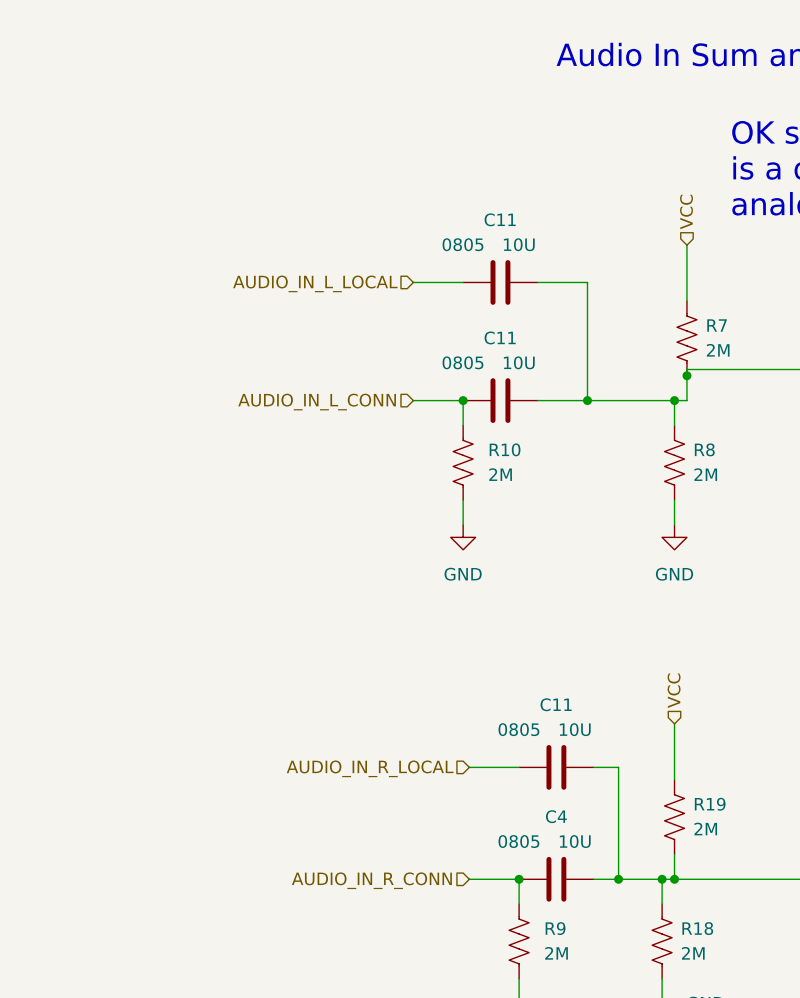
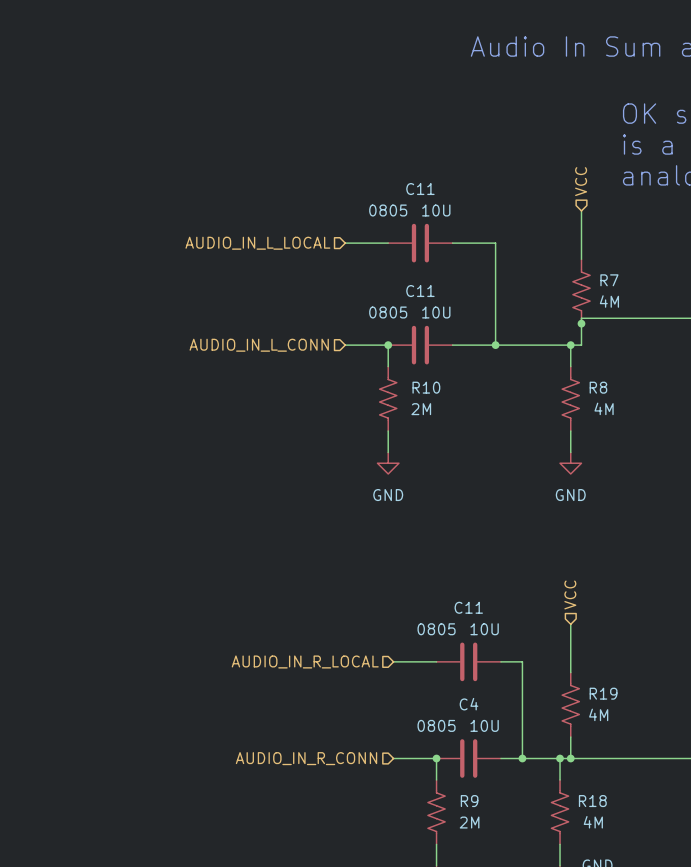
R7 value: 2M (718, 350) -> 4M (609, 301)
R8 value: 2M (705, 474) -> 4M (604, 408)
R19 value: 2M (705, 828) -> 4M (598, 714)
R18 value: 2M (693, 953) -> 4M (593, 822)

